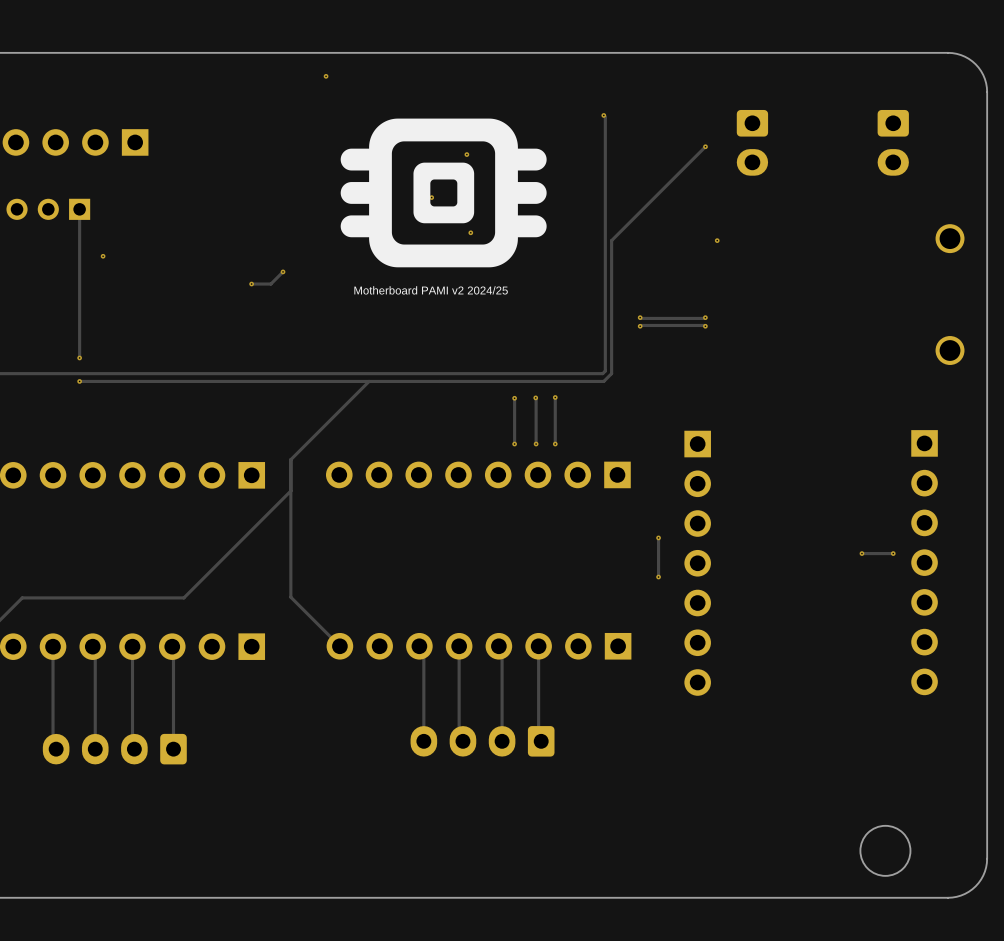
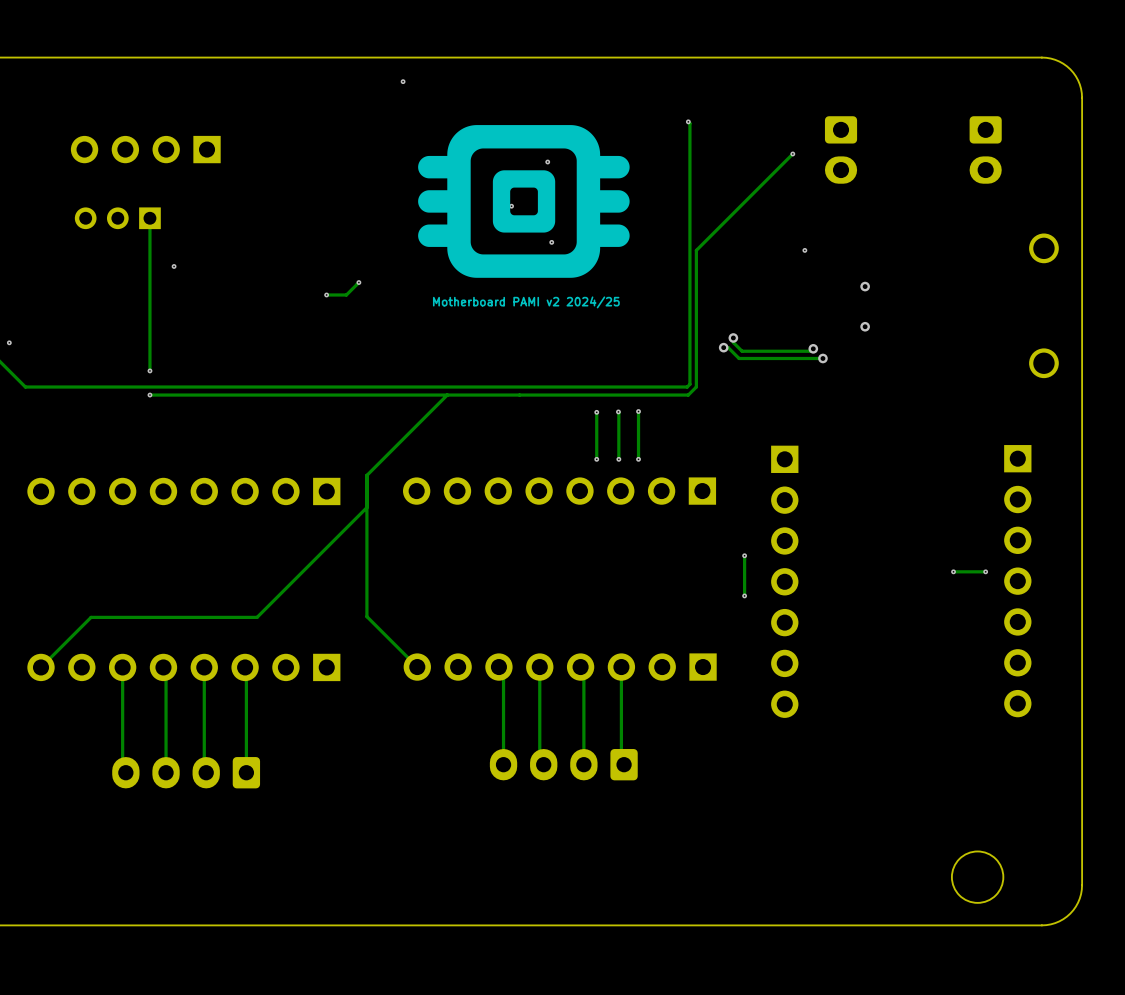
via: none -> (865, 286)
via: none -> (865, 326)
via: (640, 317) -> none
track: (705, 317) (640, 317) -> none
via: (705, 317) -> none
track: none -> (733, 337) (733, 342) (742, 351) (810, 351) (813, 348)
via: none -> (733, 337)
via: (640, 326) -> none
track: (705, 326) (640, 326) -> none
via: (705, 326) -> none
track: none -> (723, 347) (728, 347) (739, 358) (822, 358)
via: none -> (723, 347)
via: none -> (813, 348)
via: none -> (822, 358)

